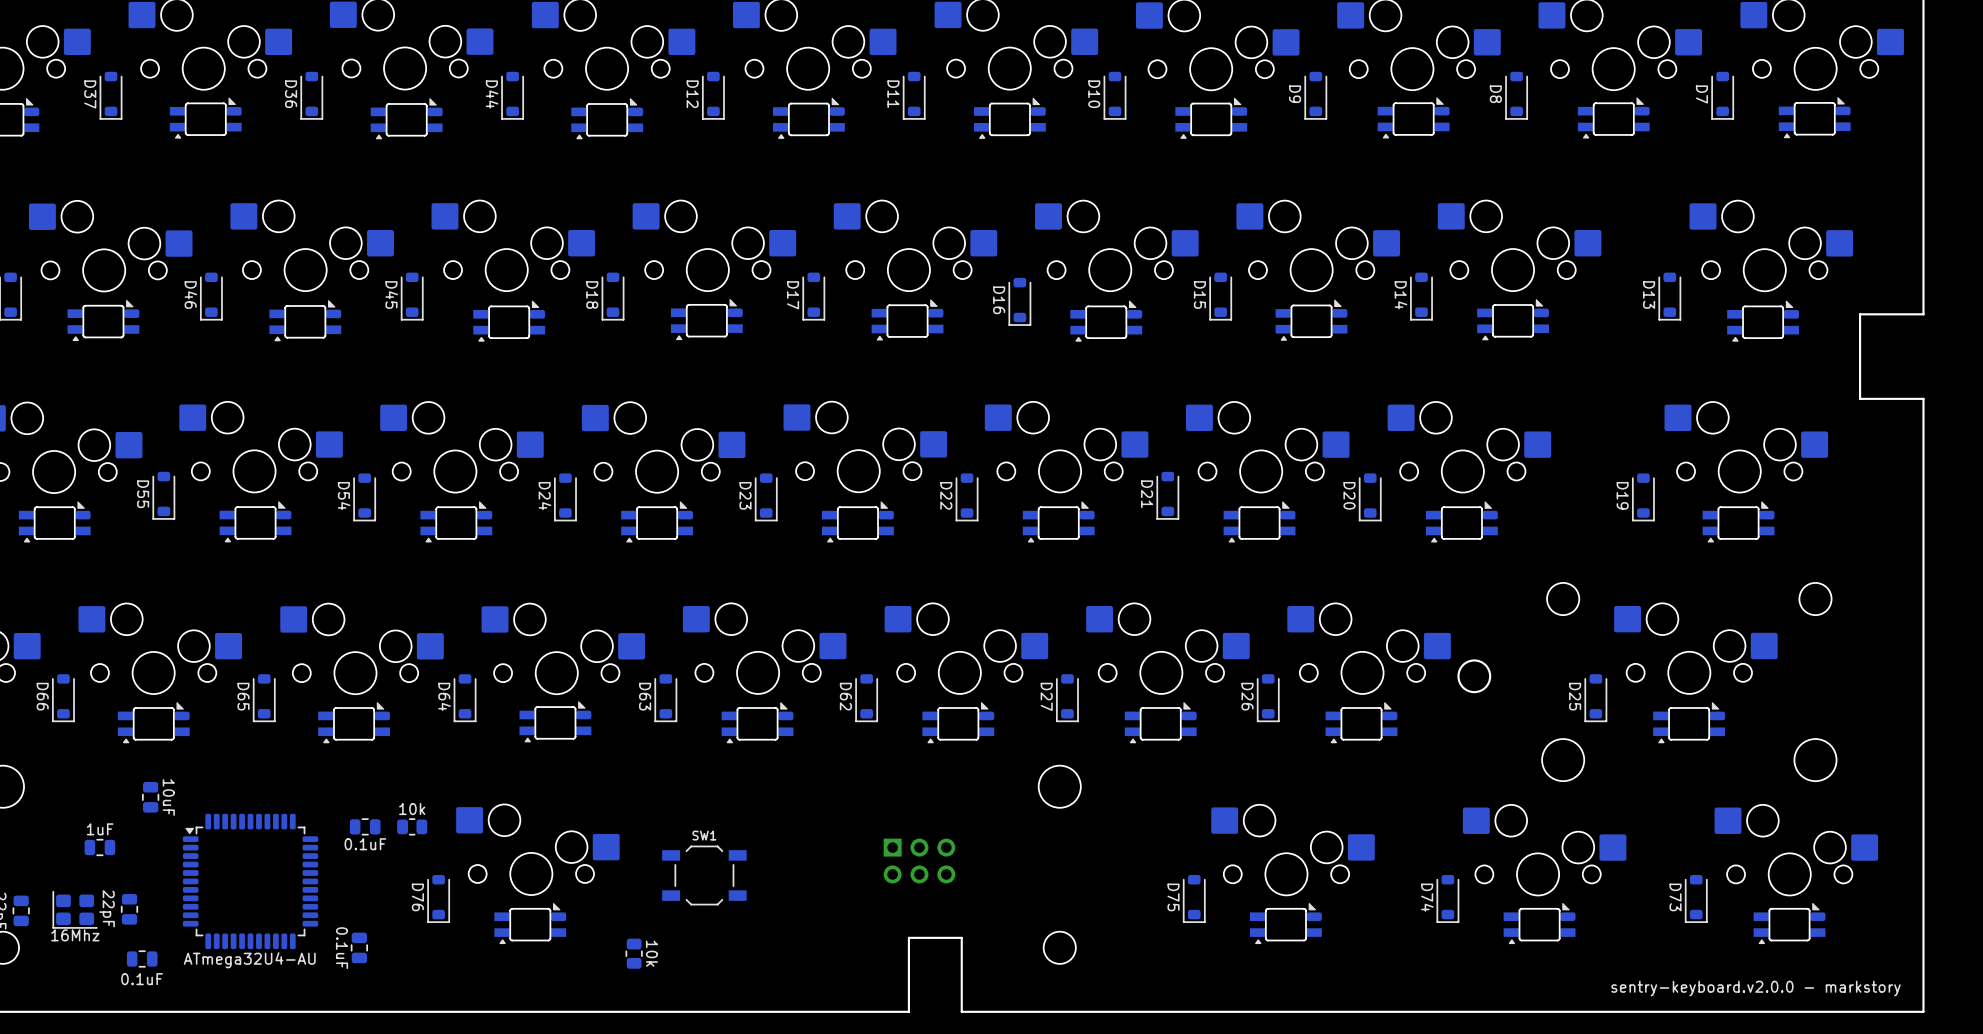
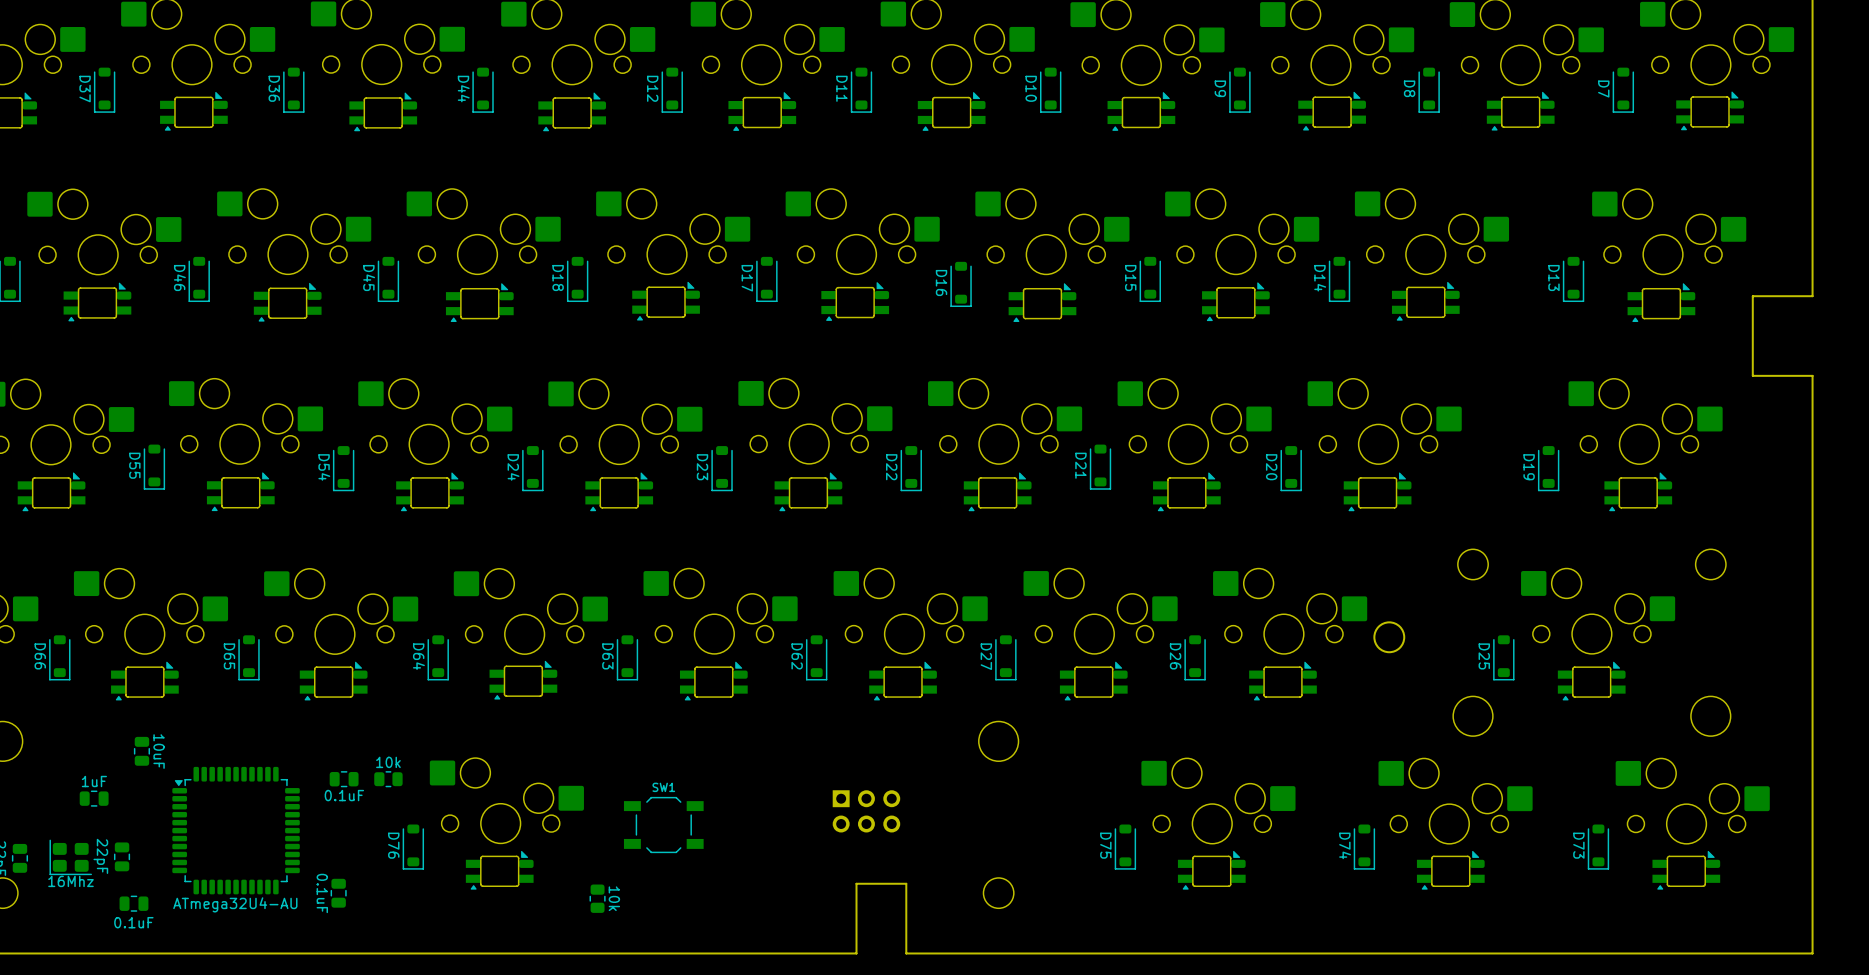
text: sentry-keyboard.v2.0.0 - markstory (1756, 988) -> none

